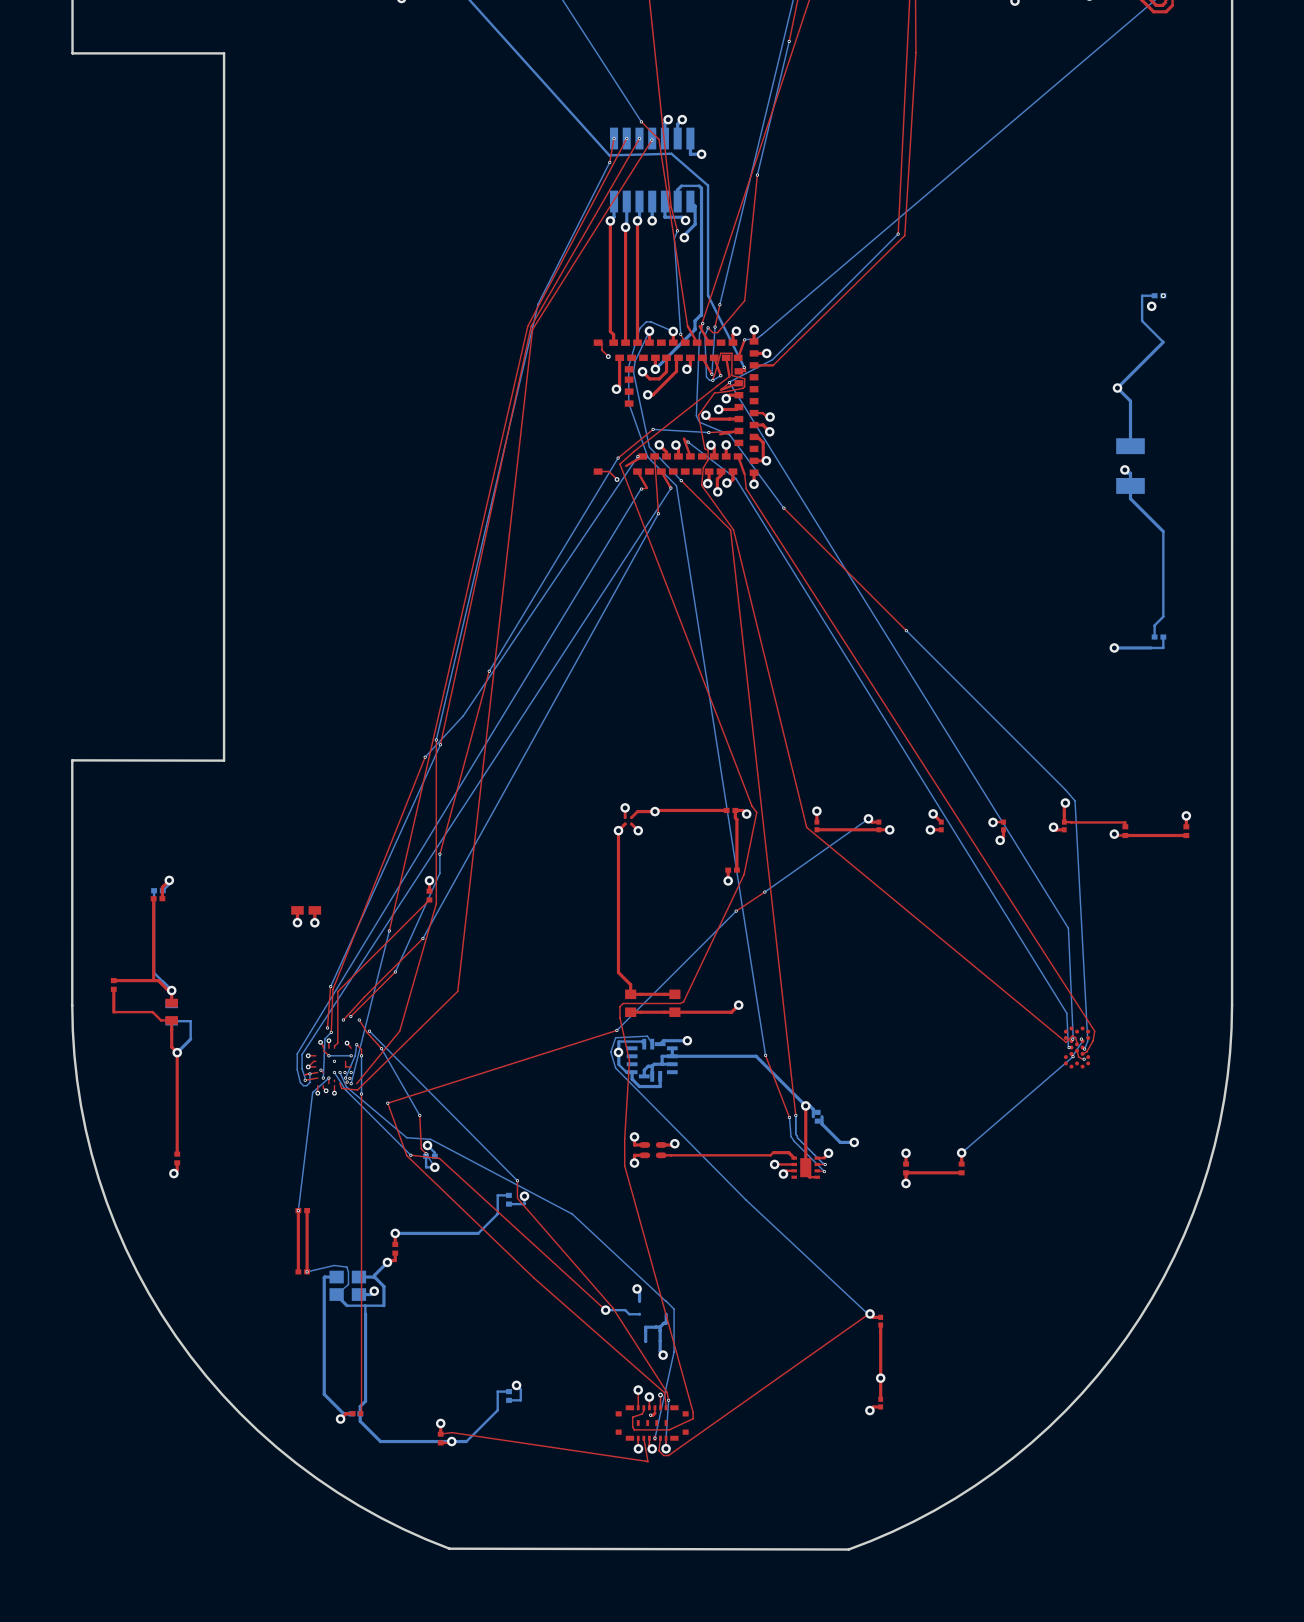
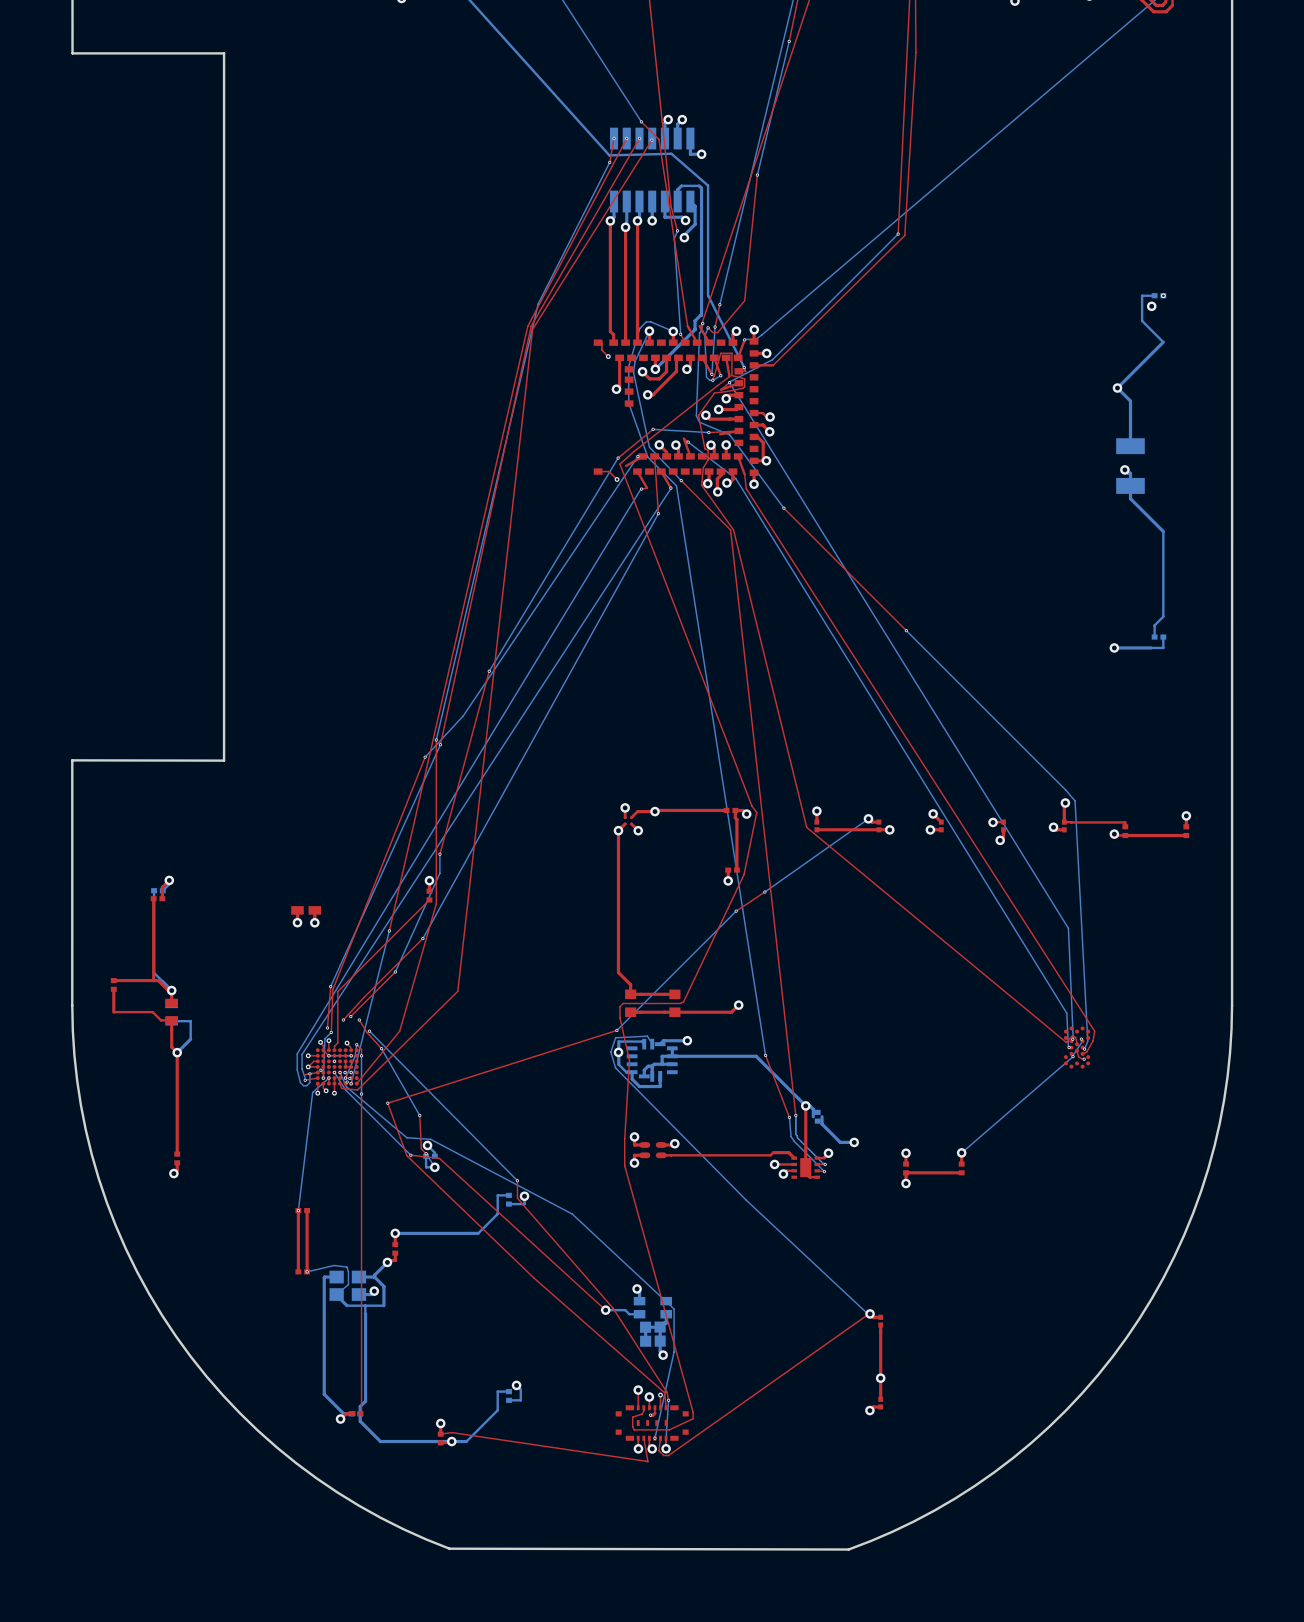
part: none -> (337, 1066)
part: none -> (652, 1321)

